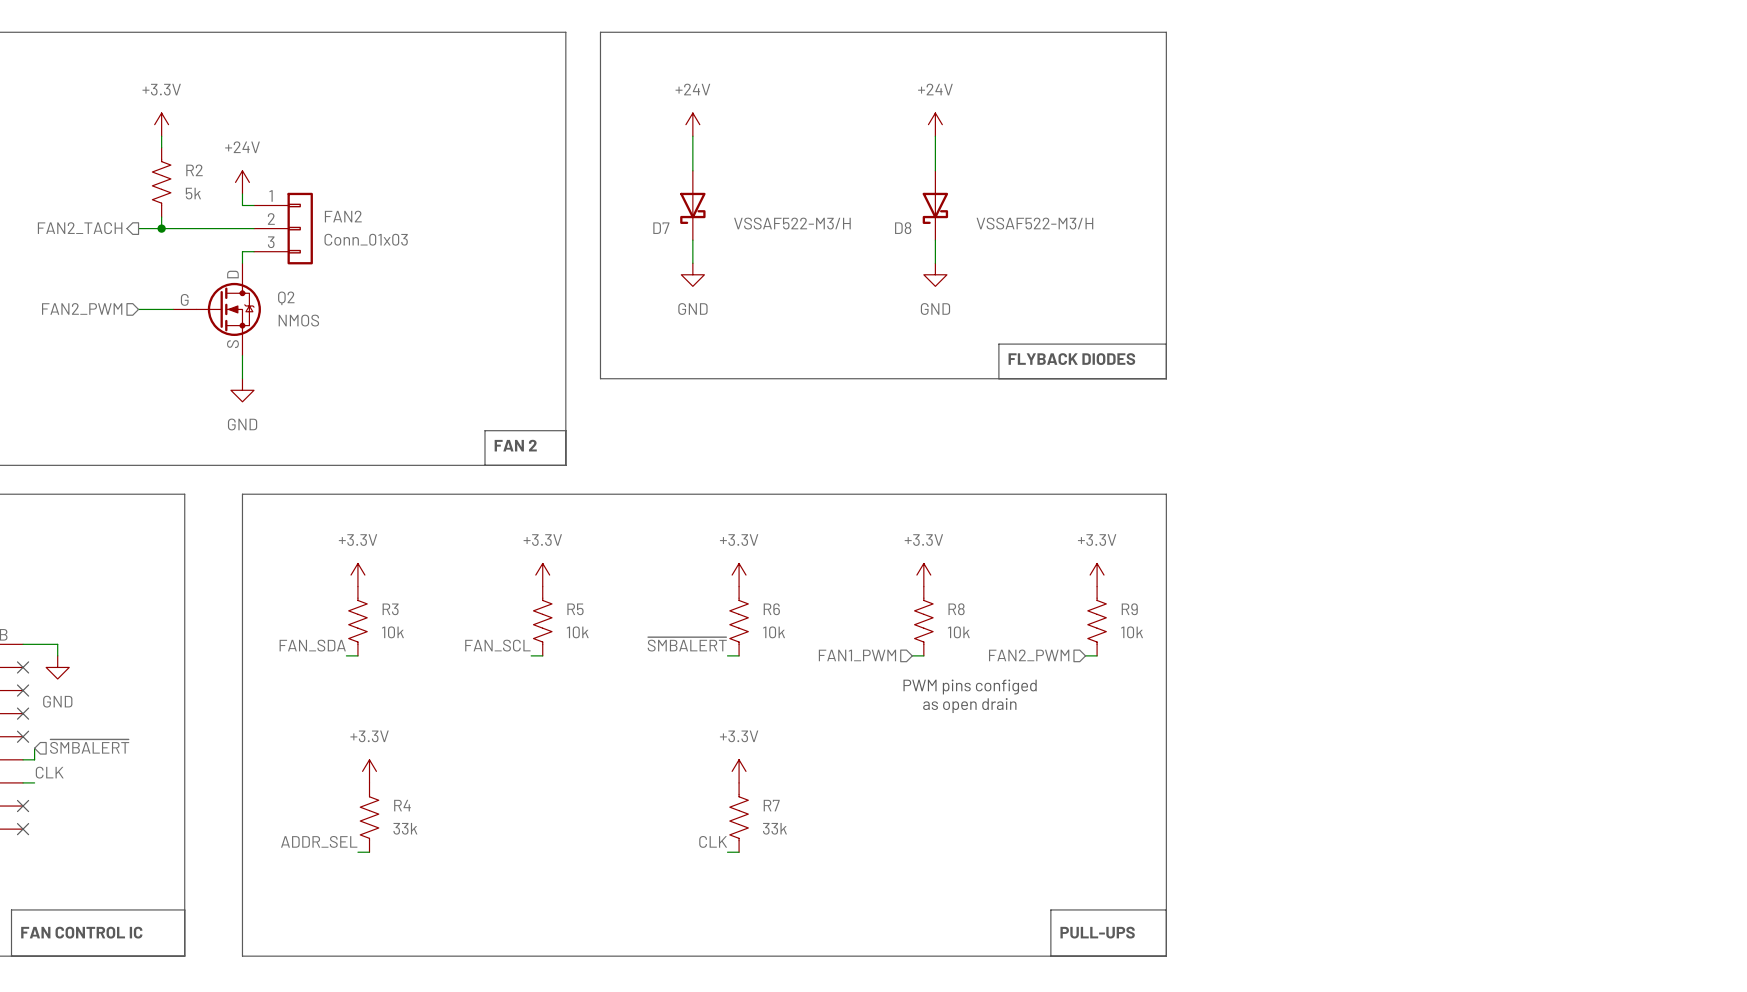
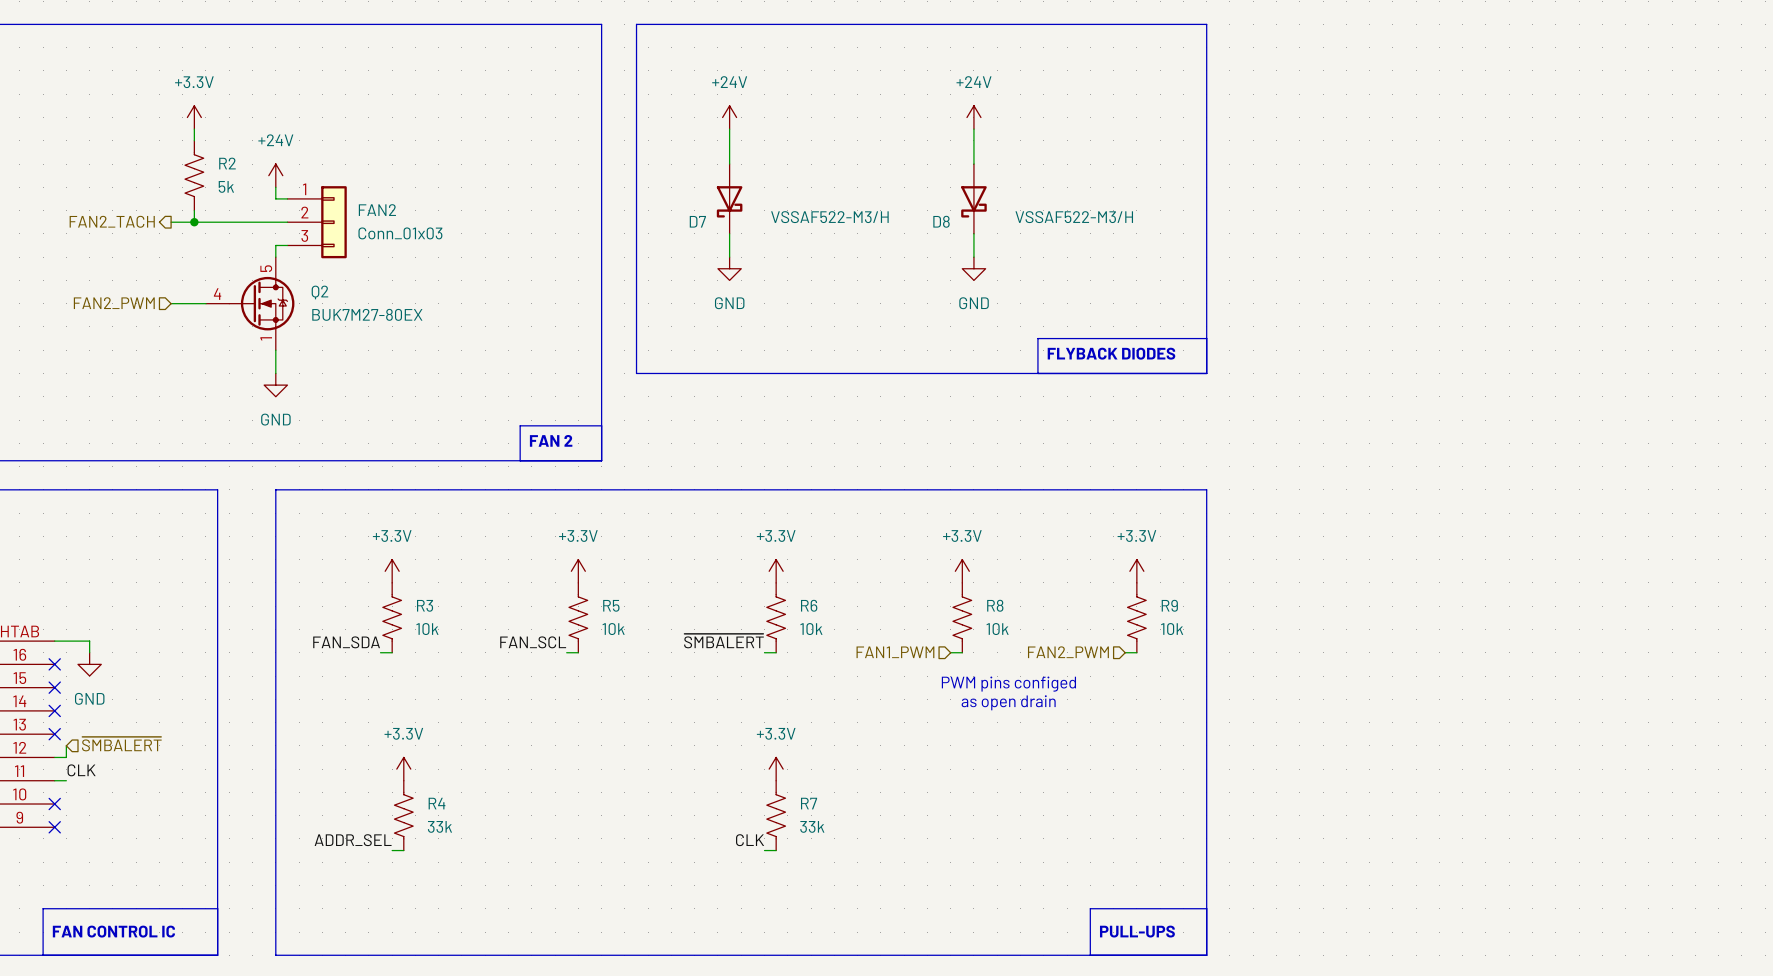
Q2 pin name: D (232, 274) -> none
Q2 pin number: none -> 5 (266, 268)
Q2 pin name: G (184, 299) -> none
Q2 pin number: none -> 4 (217, 294)
Q2 value: NMOS (298, 320) -> BUK7M27-80EX (367, 314)
Q2 pin name: S (232, 344) -> none
Q2 pin number: none -> 1 (266, 338)

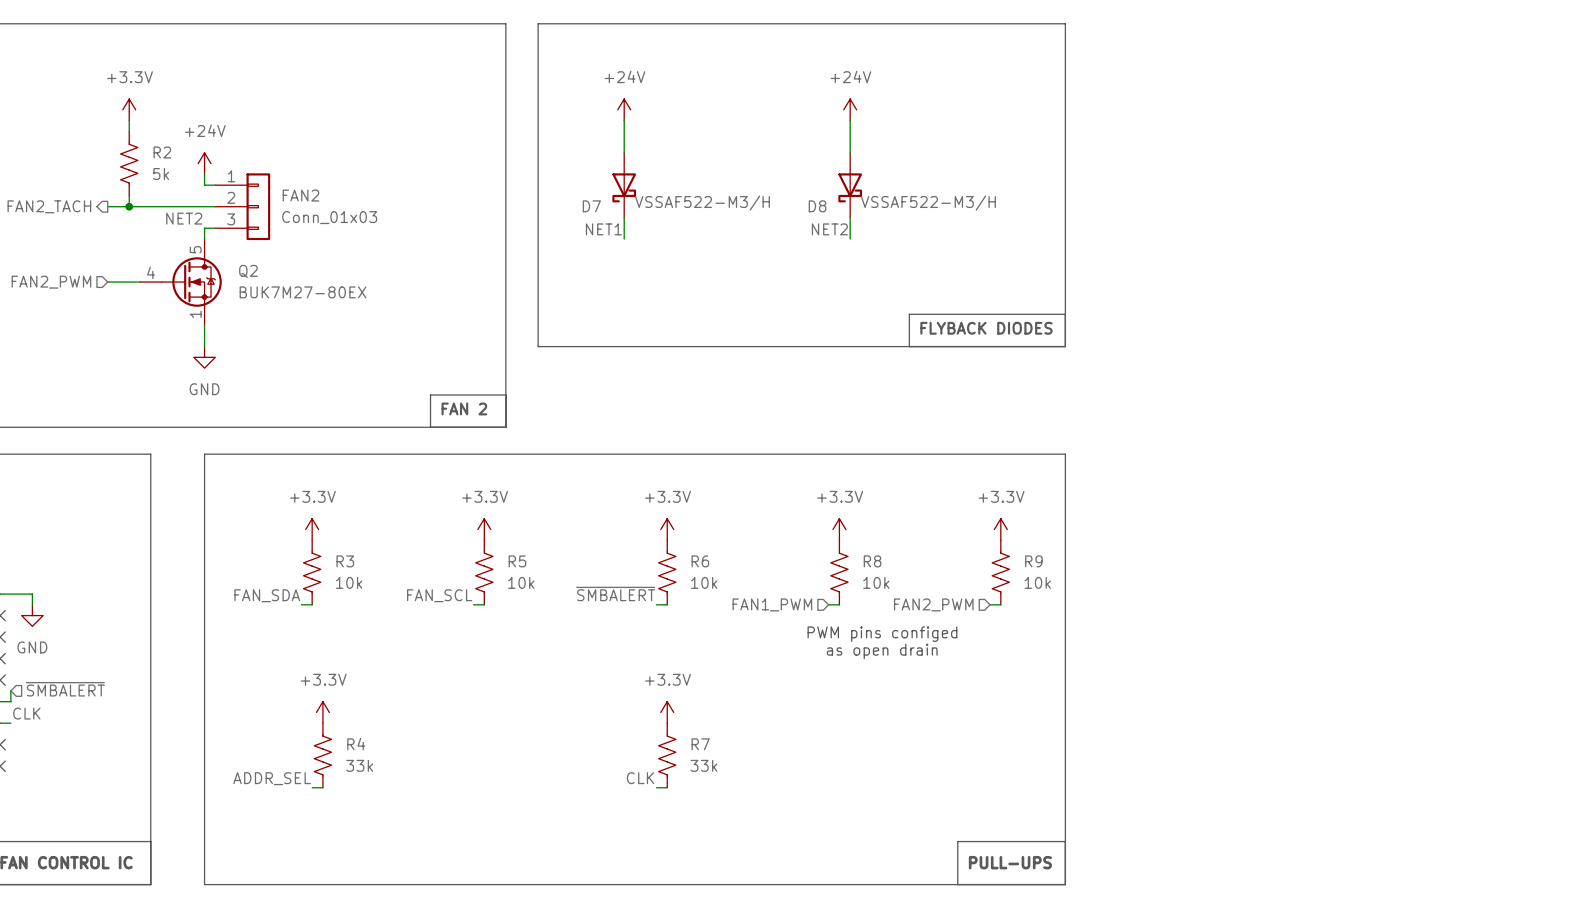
label: none -> NET2 (184, 218)
label: none -> NET1 (603, 229)
label: none -> NET2 (829, 229)
power symbol: GND (729, 268) -> none
power symbol: GND (973, 268) -> none

